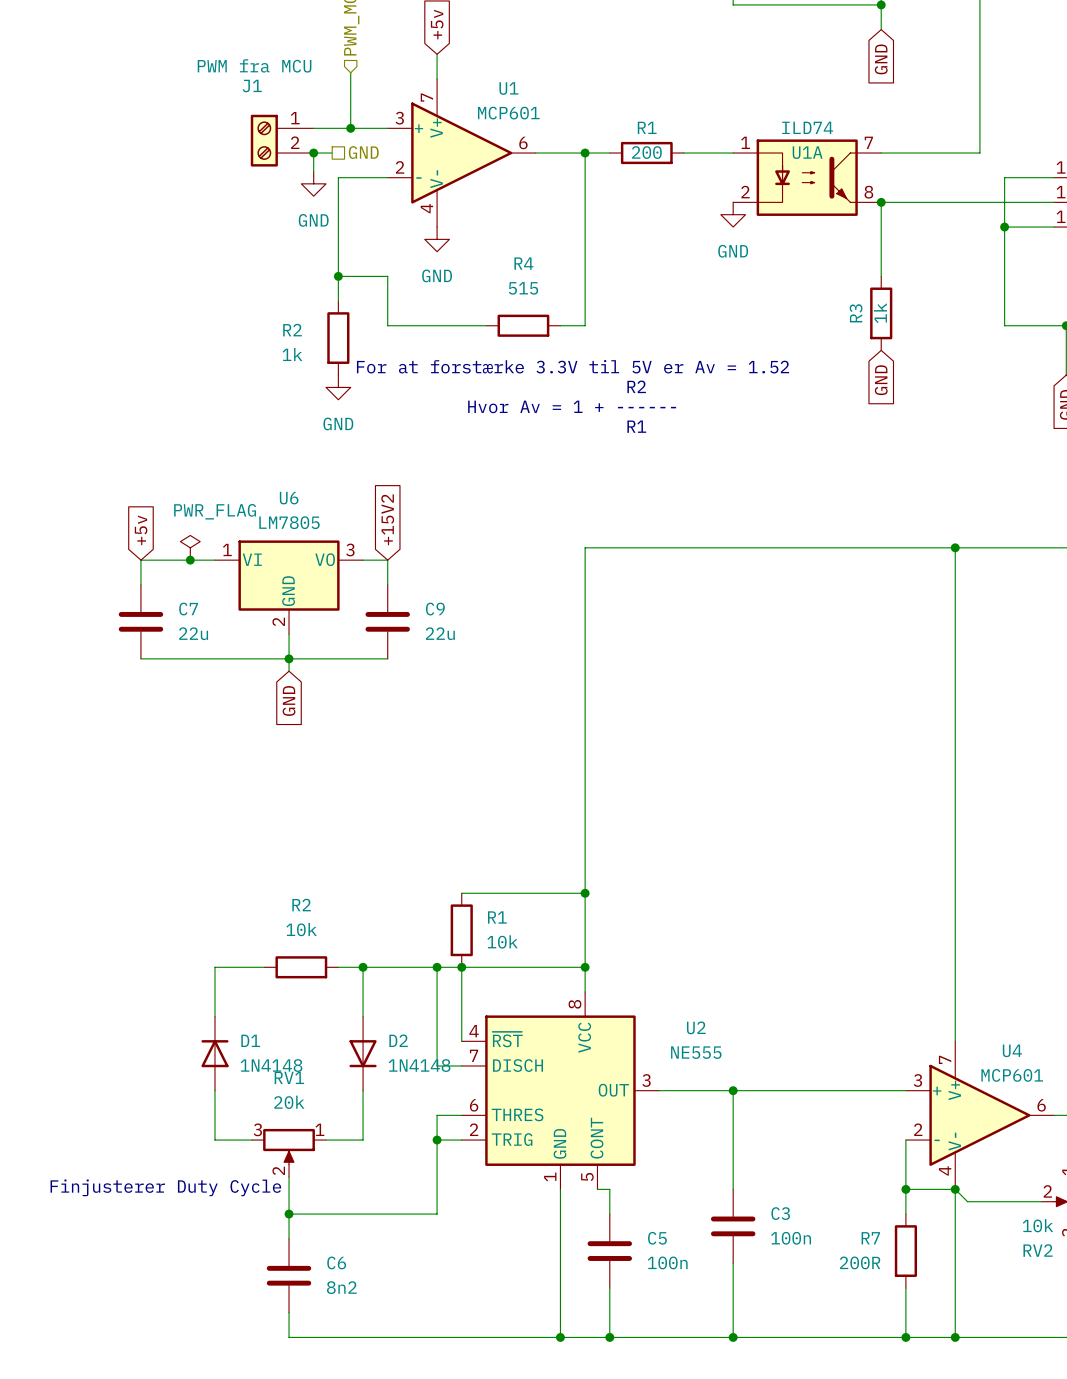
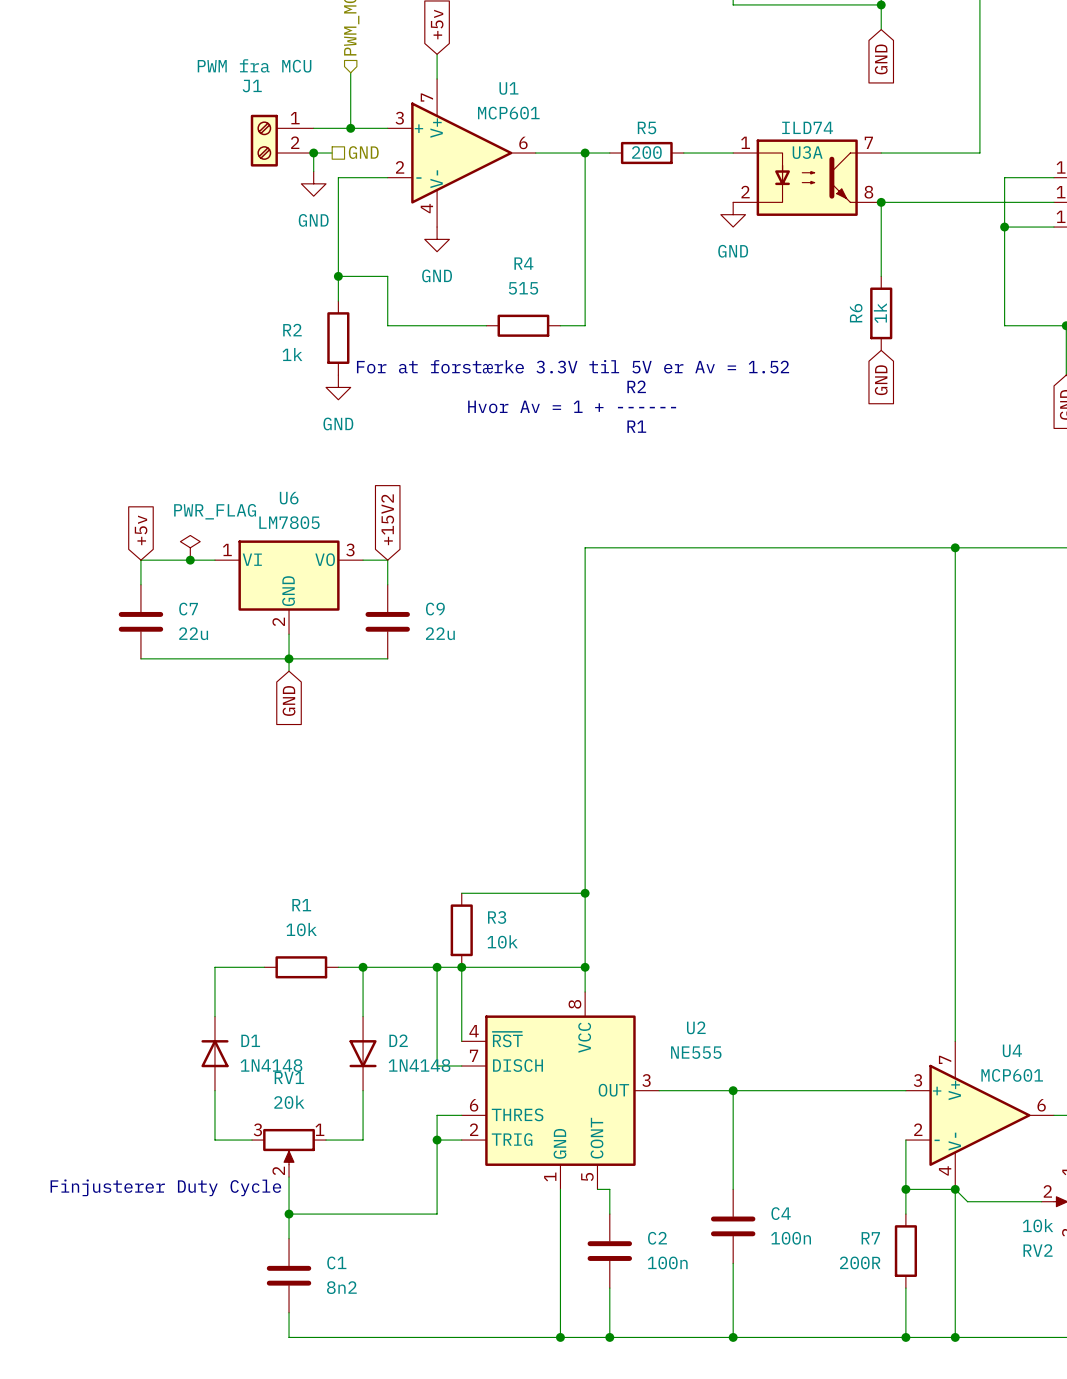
R1 name: R1 (647, 127) -> R5 (647, 127)
U1A name: U1A (807, 152) -> U3A (807, 152)
R3 name: R3 (856, 313) -> R6 (856, 313)
R2 name: R2 (301, 905) -> R1 (301, 905)
R1 name: R1 (497, 917) -> R3 (497, 917)
C3 name: C3 (780, 1213) -> C4 (781, 1213)
C5 name: C5 (657, 1238) -> C2 (657, 1238)
C6 name: C6 (336, 1262) -> C1 (336, 1262)

